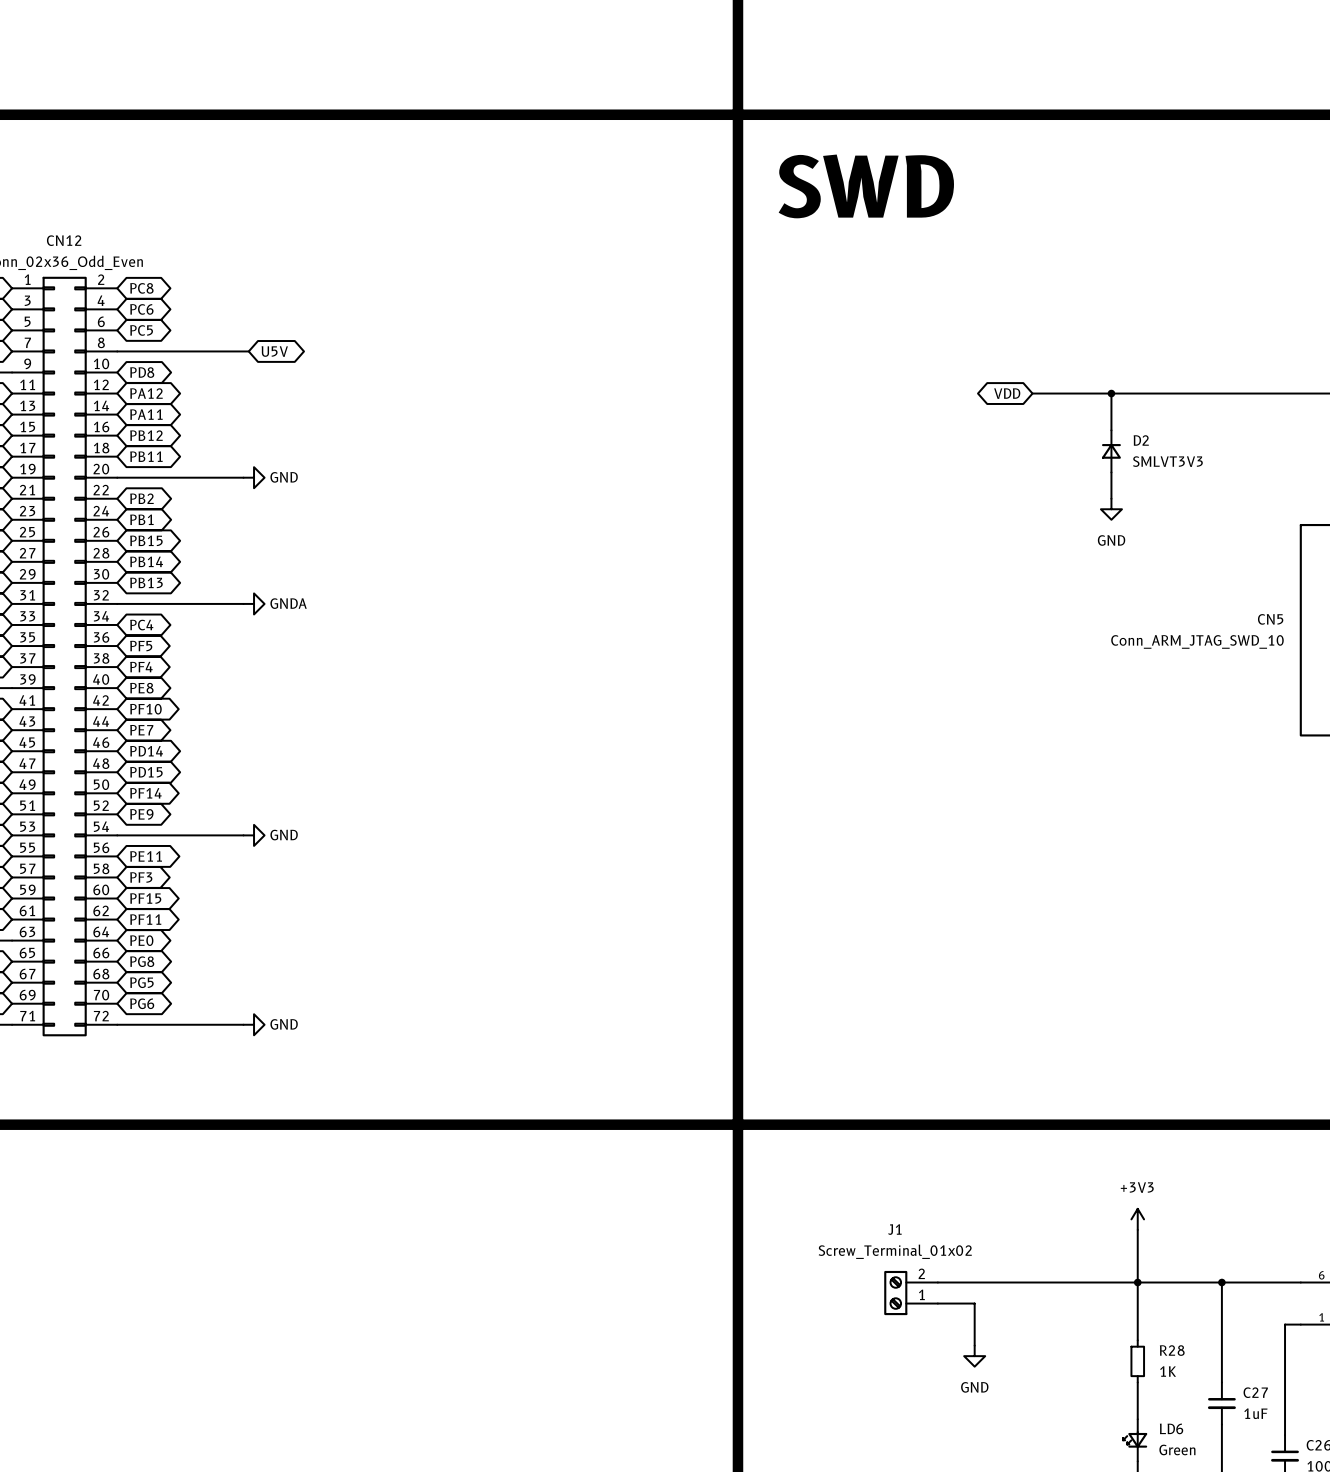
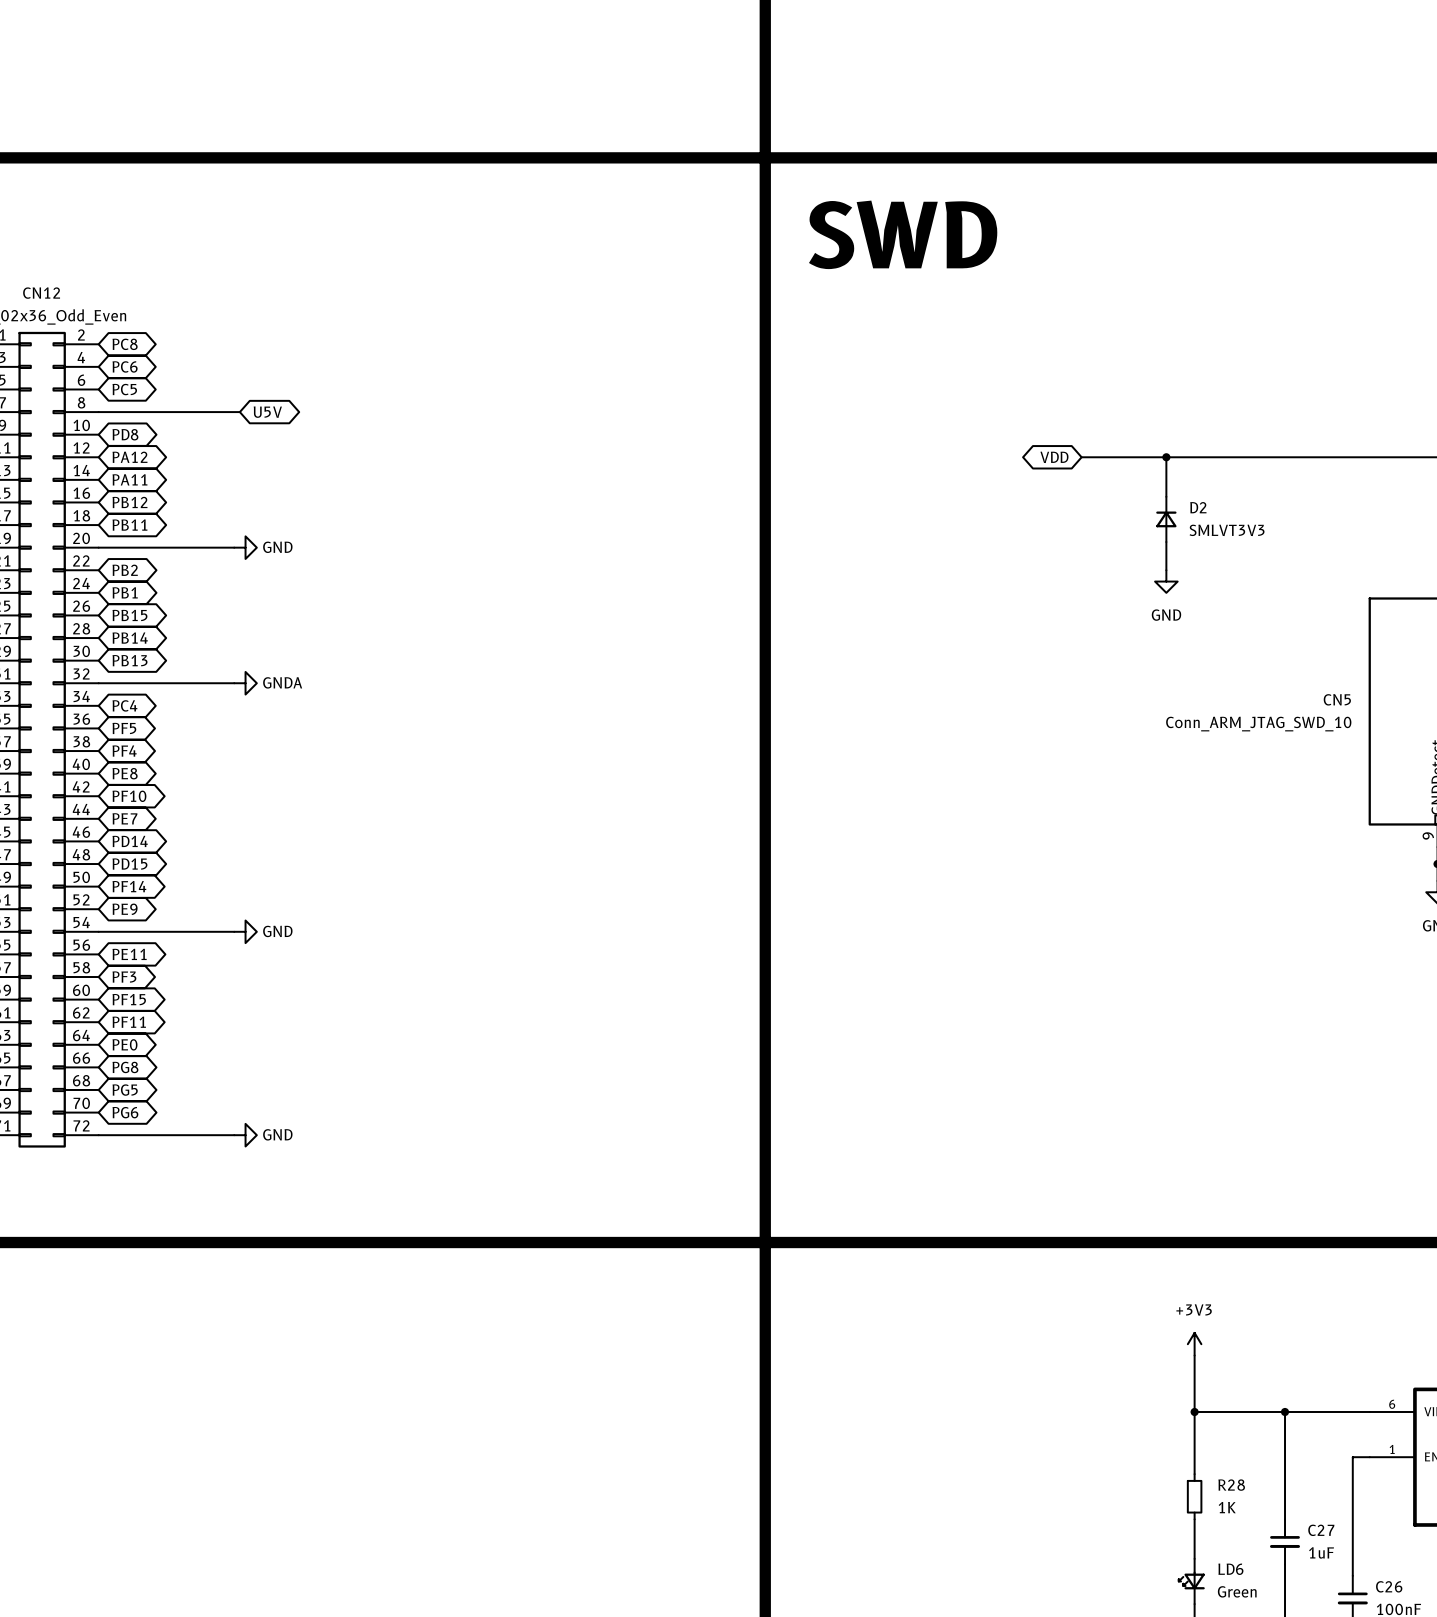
wire: (937, 1282) (1137, 1282) -> none
J1: Screw_Terminal_01x02 (911, 1293) -> none
wire: (937, 1303) (974, 1303) (974, 1345) -> none
power symbol: GND (974, 1356) -> none

